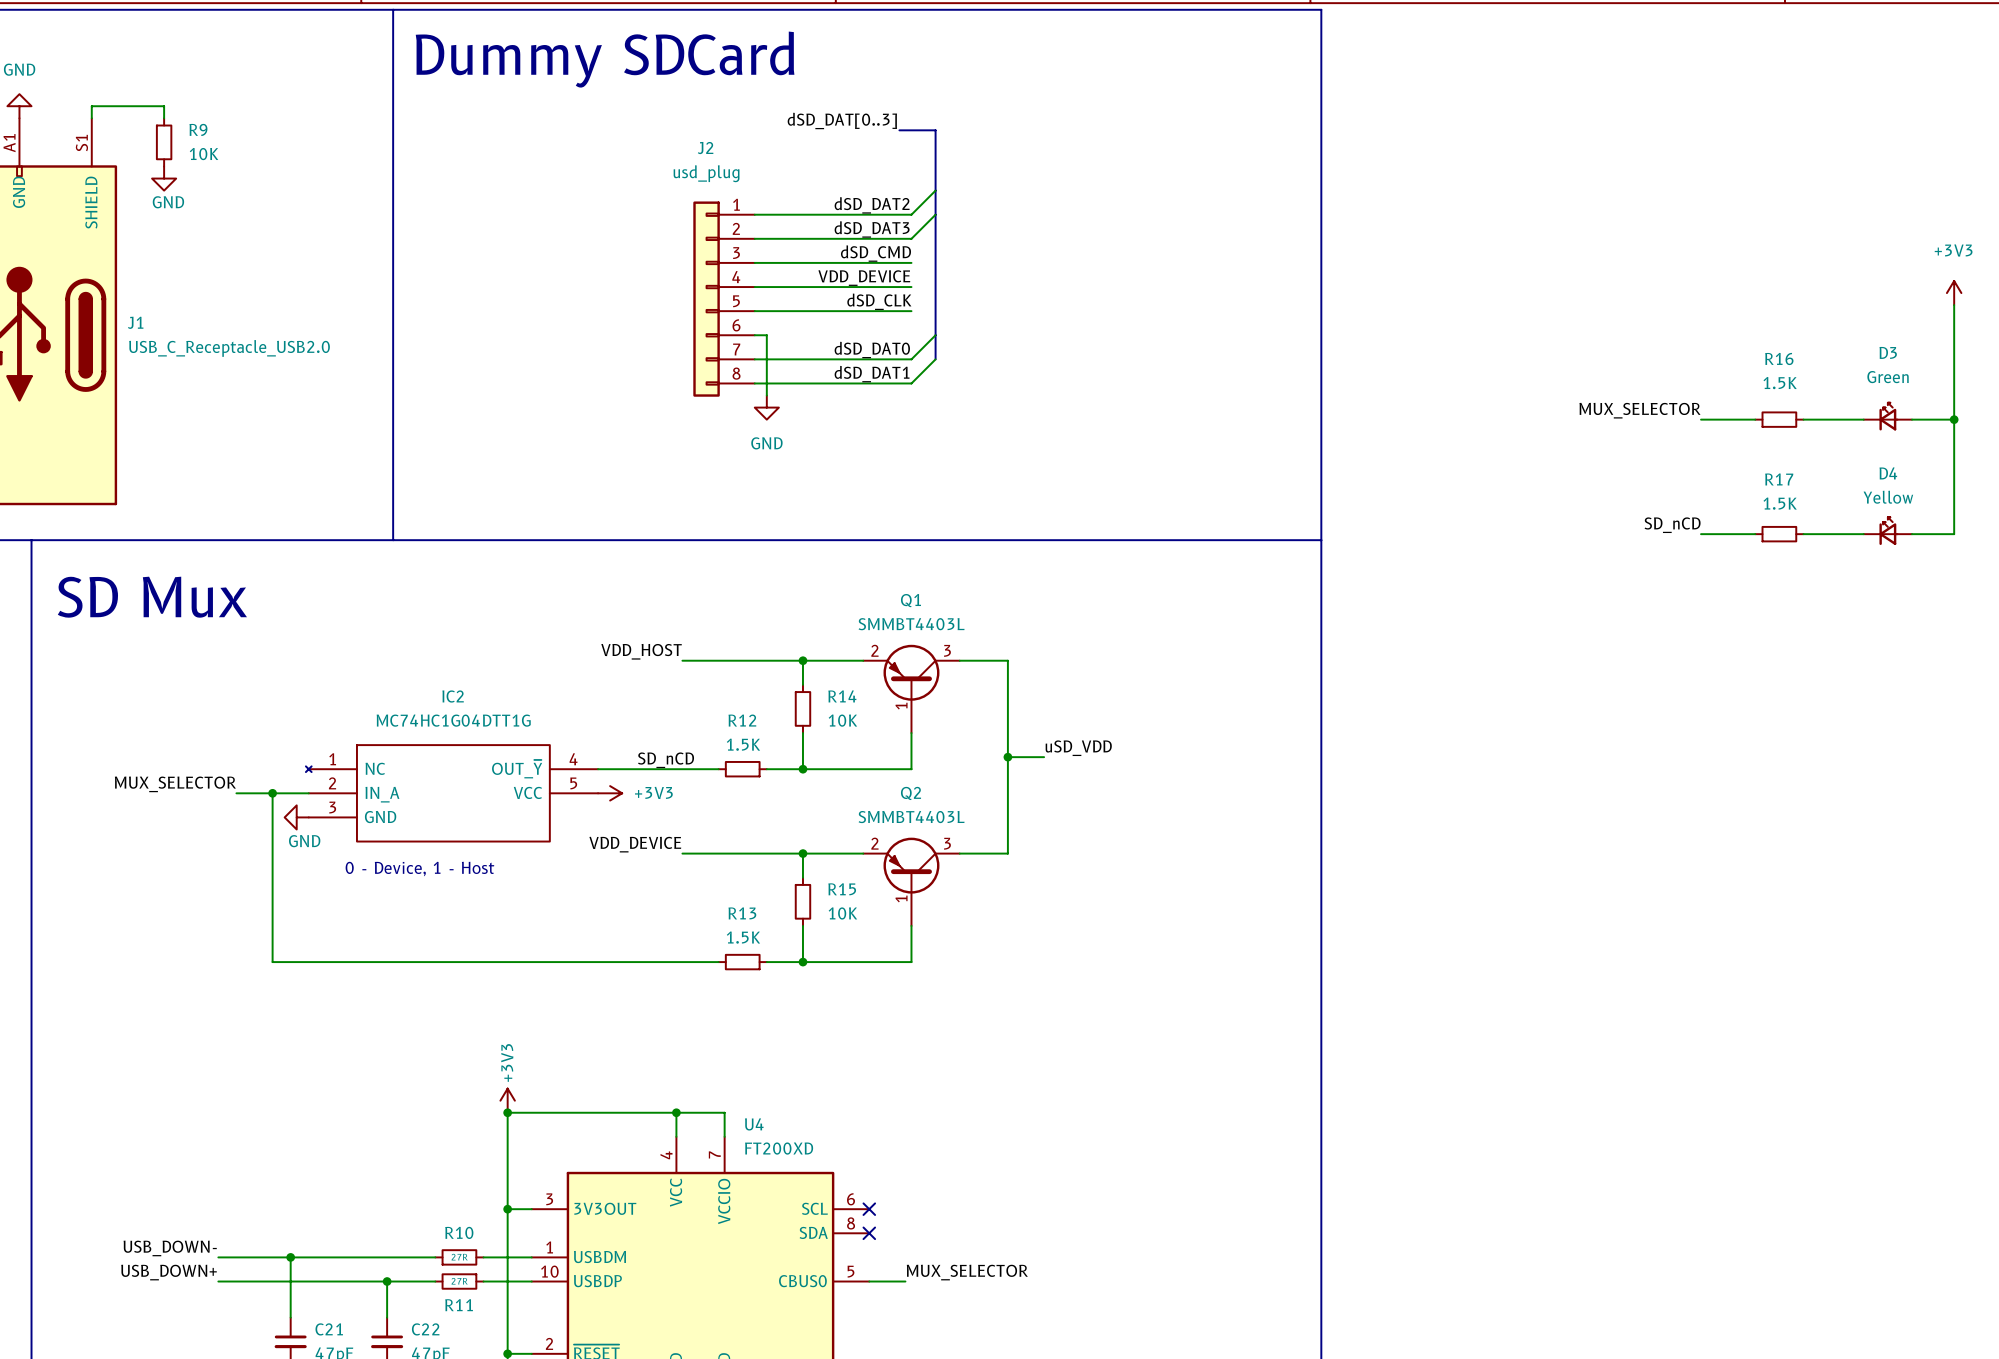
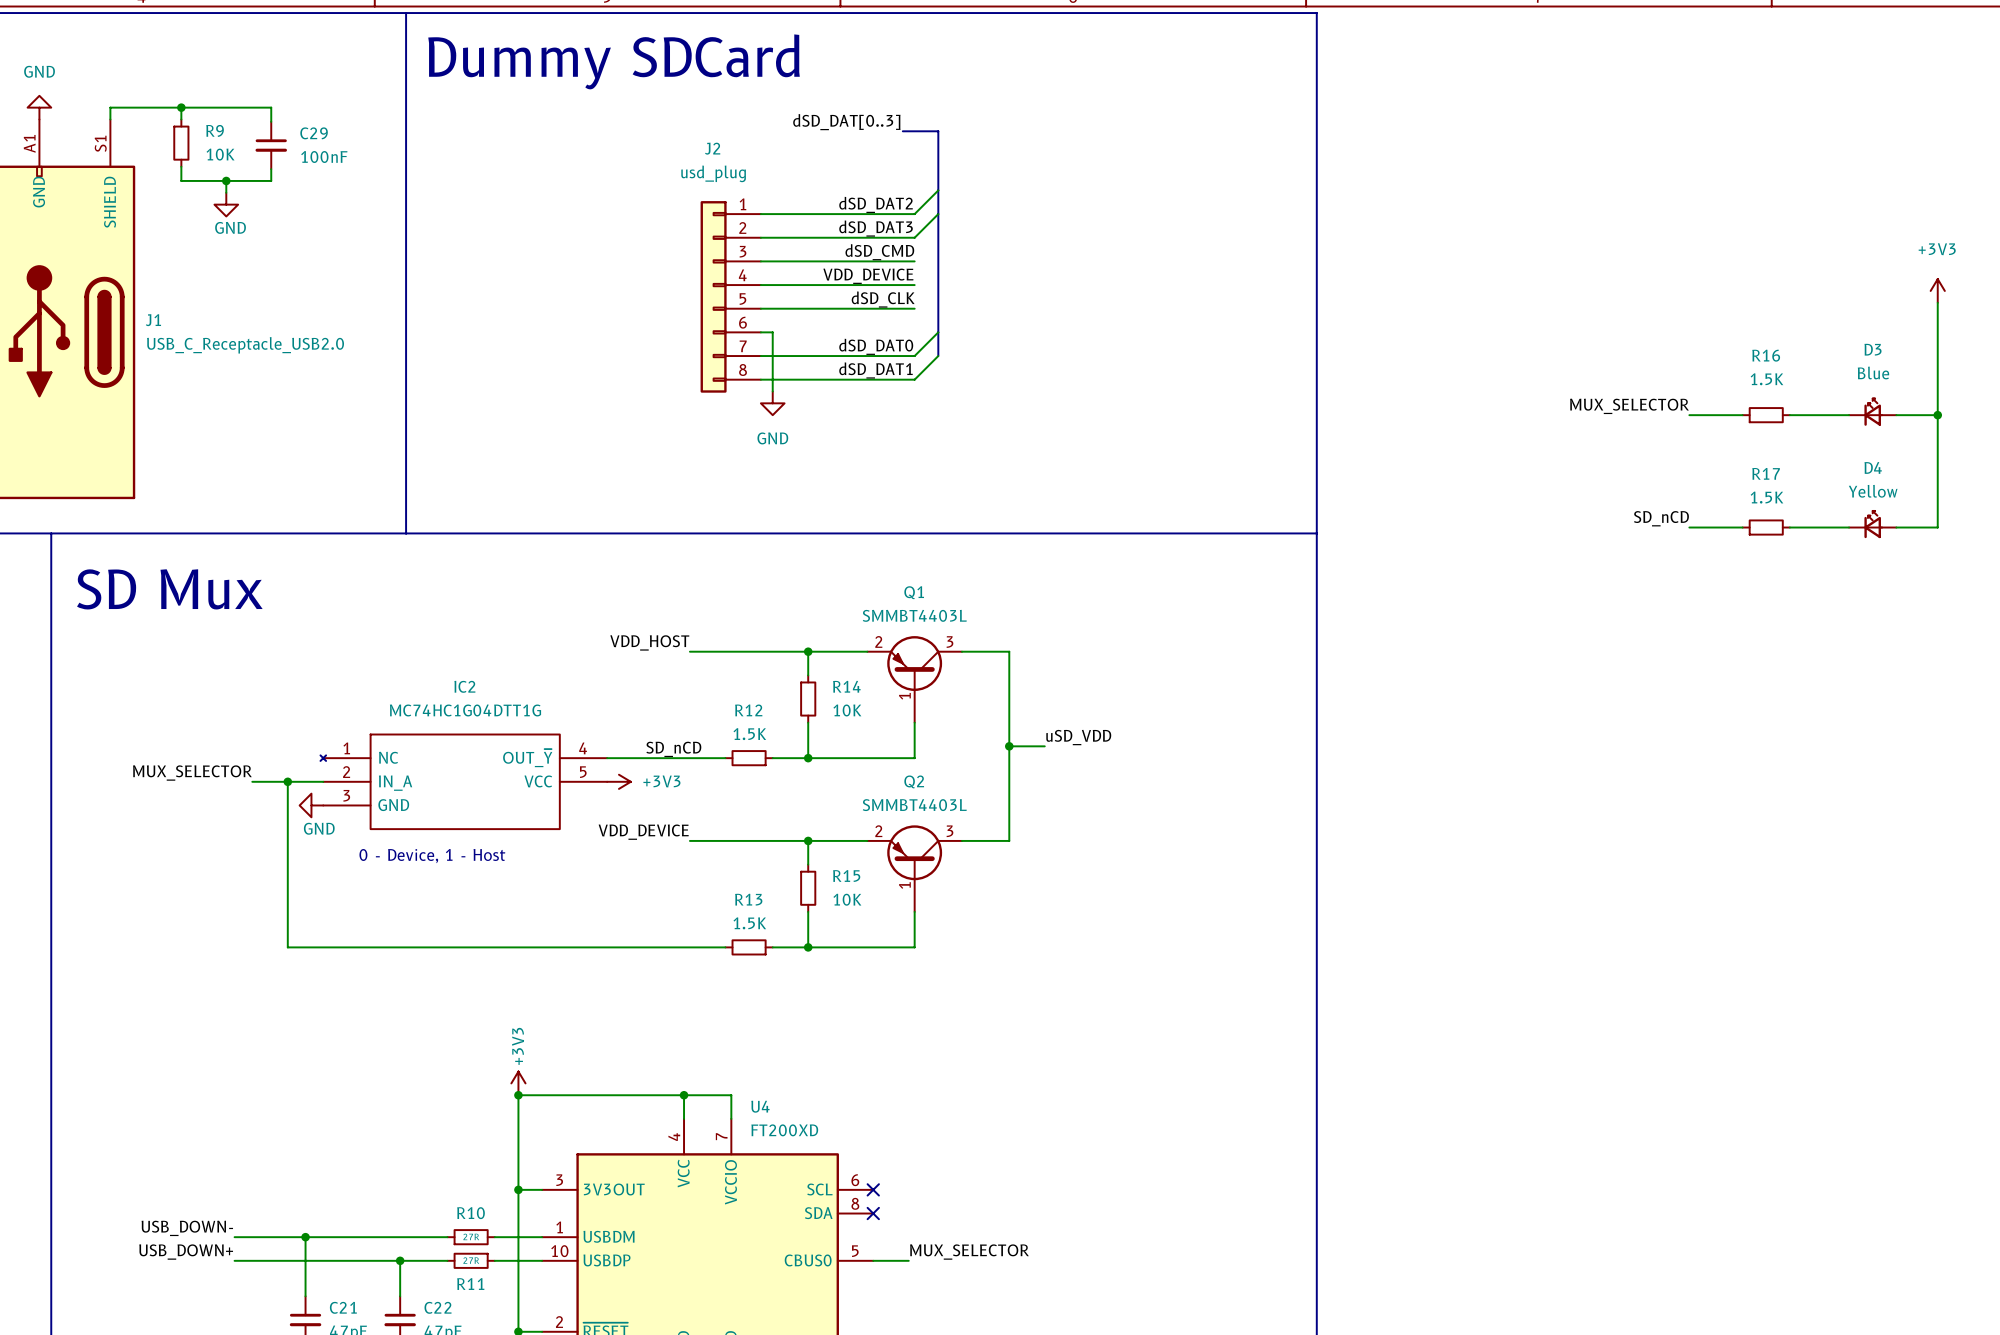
wire: none -> (181, 107) (271, 107) (271, 121)
junction: none -> (181, 107)
C29: none -> 100nF (271, 145)
wire: none -> (181, 166) (181, 180) (271, 180) (271, 169)
power symbol position: GND (164, 178) -> GND (226, 204)
wire: none -> (226, 180) (226, 192)
junction: none -> (226, 180)
D3 value: Green (1888, 377) -> Blue (1873, 372)

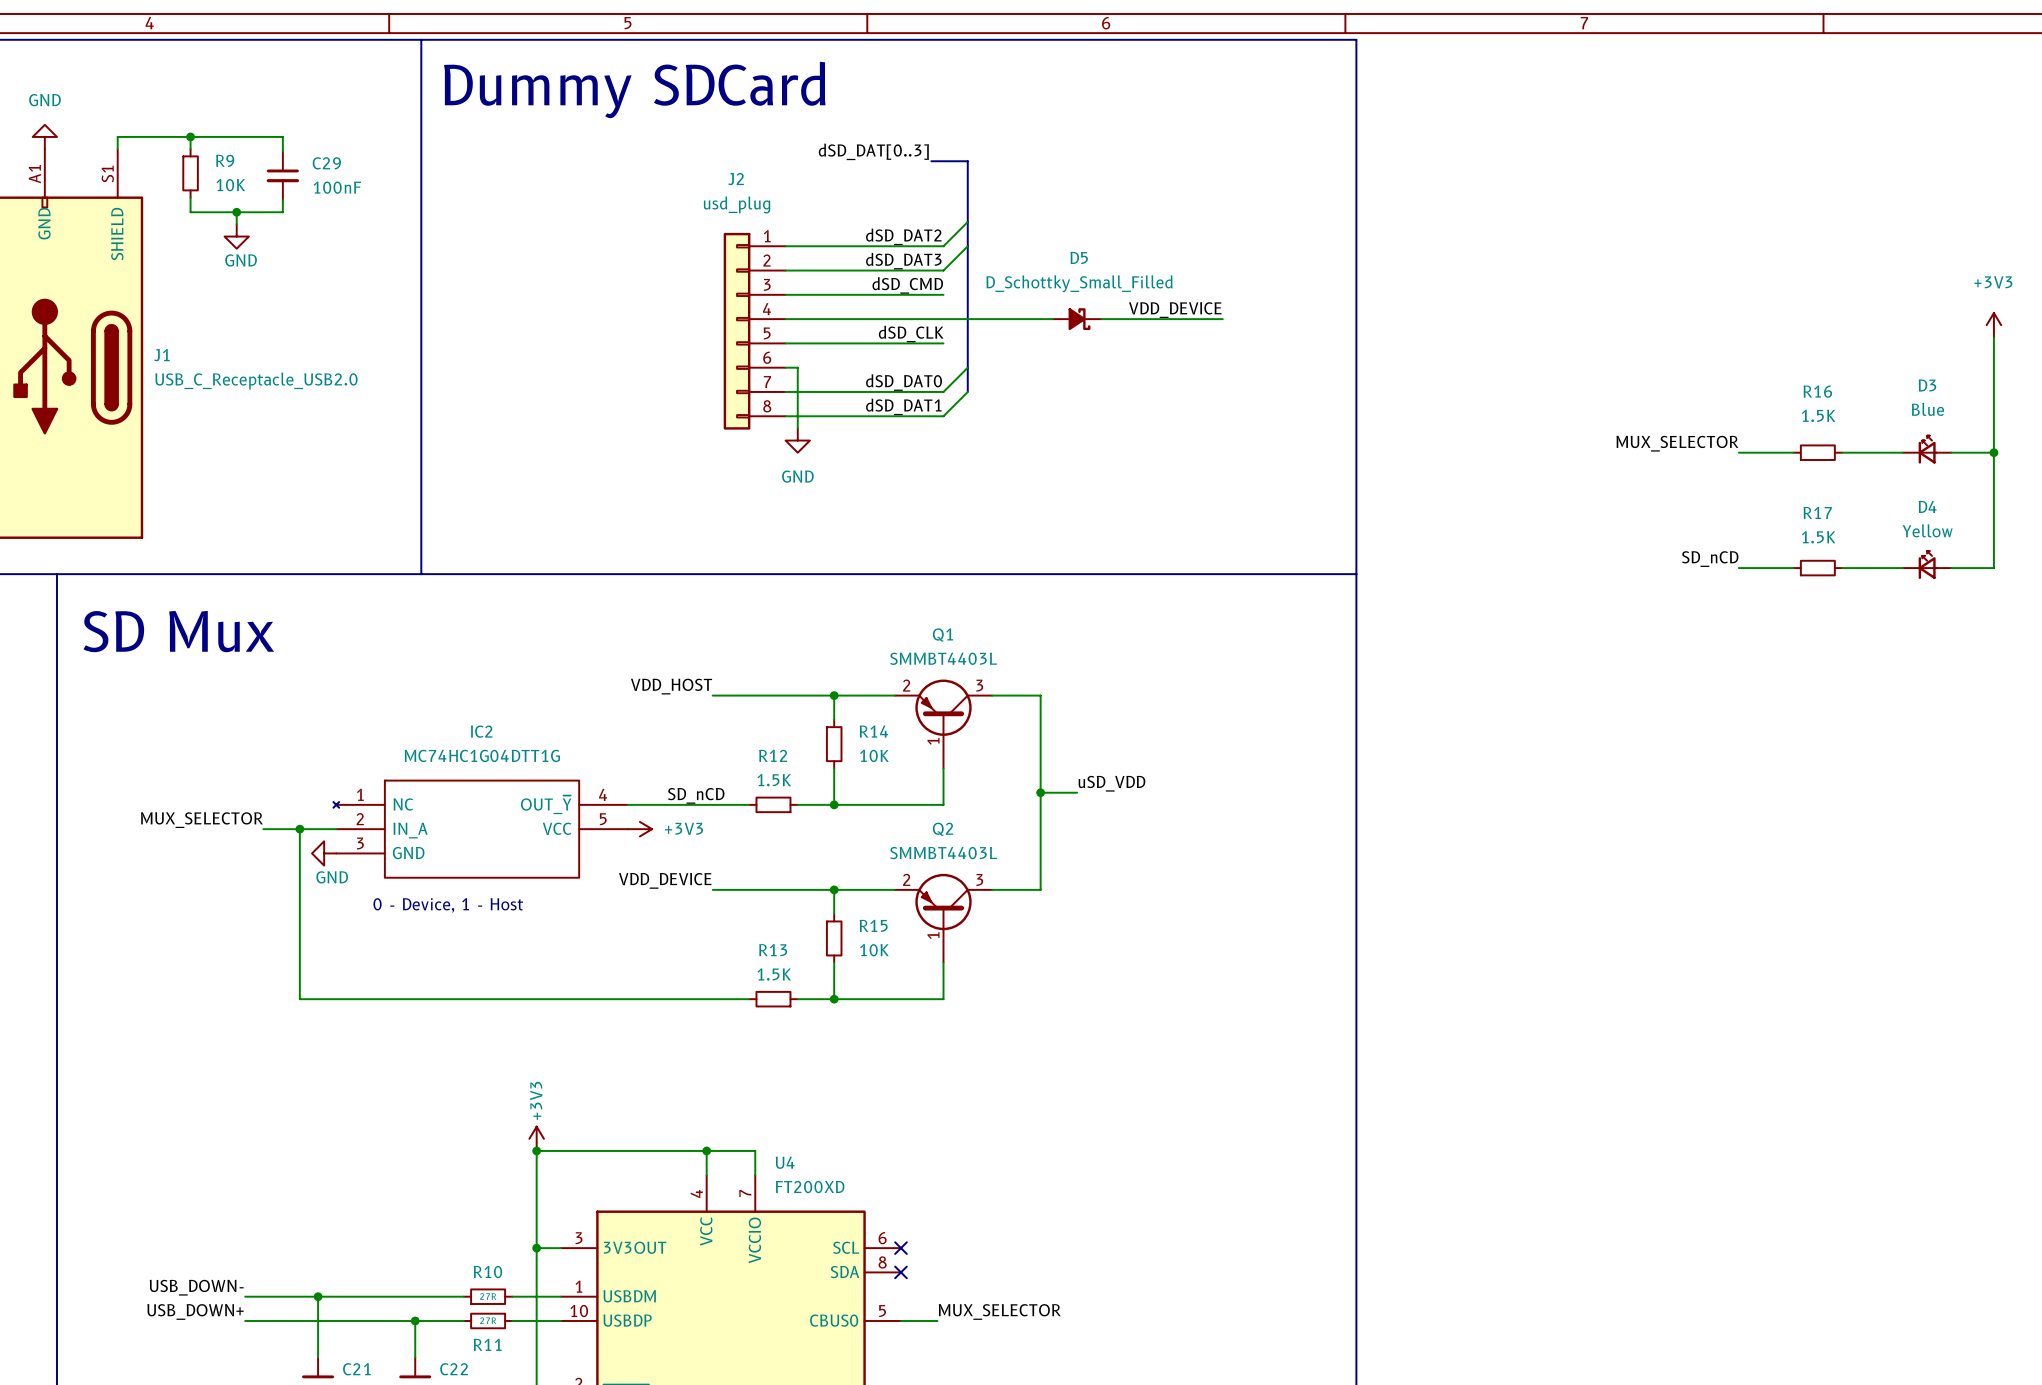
label: VDD_DEVICE (868, 276) -> none
label: none -> VDD_DEVICE (1175, 310)
wire: none -> (943, 319) (1052, 319)
D5: none -> D_Schottky_Small_Filled (1077, 319)
wire: none -> (1101, 319) (1222, 319)

